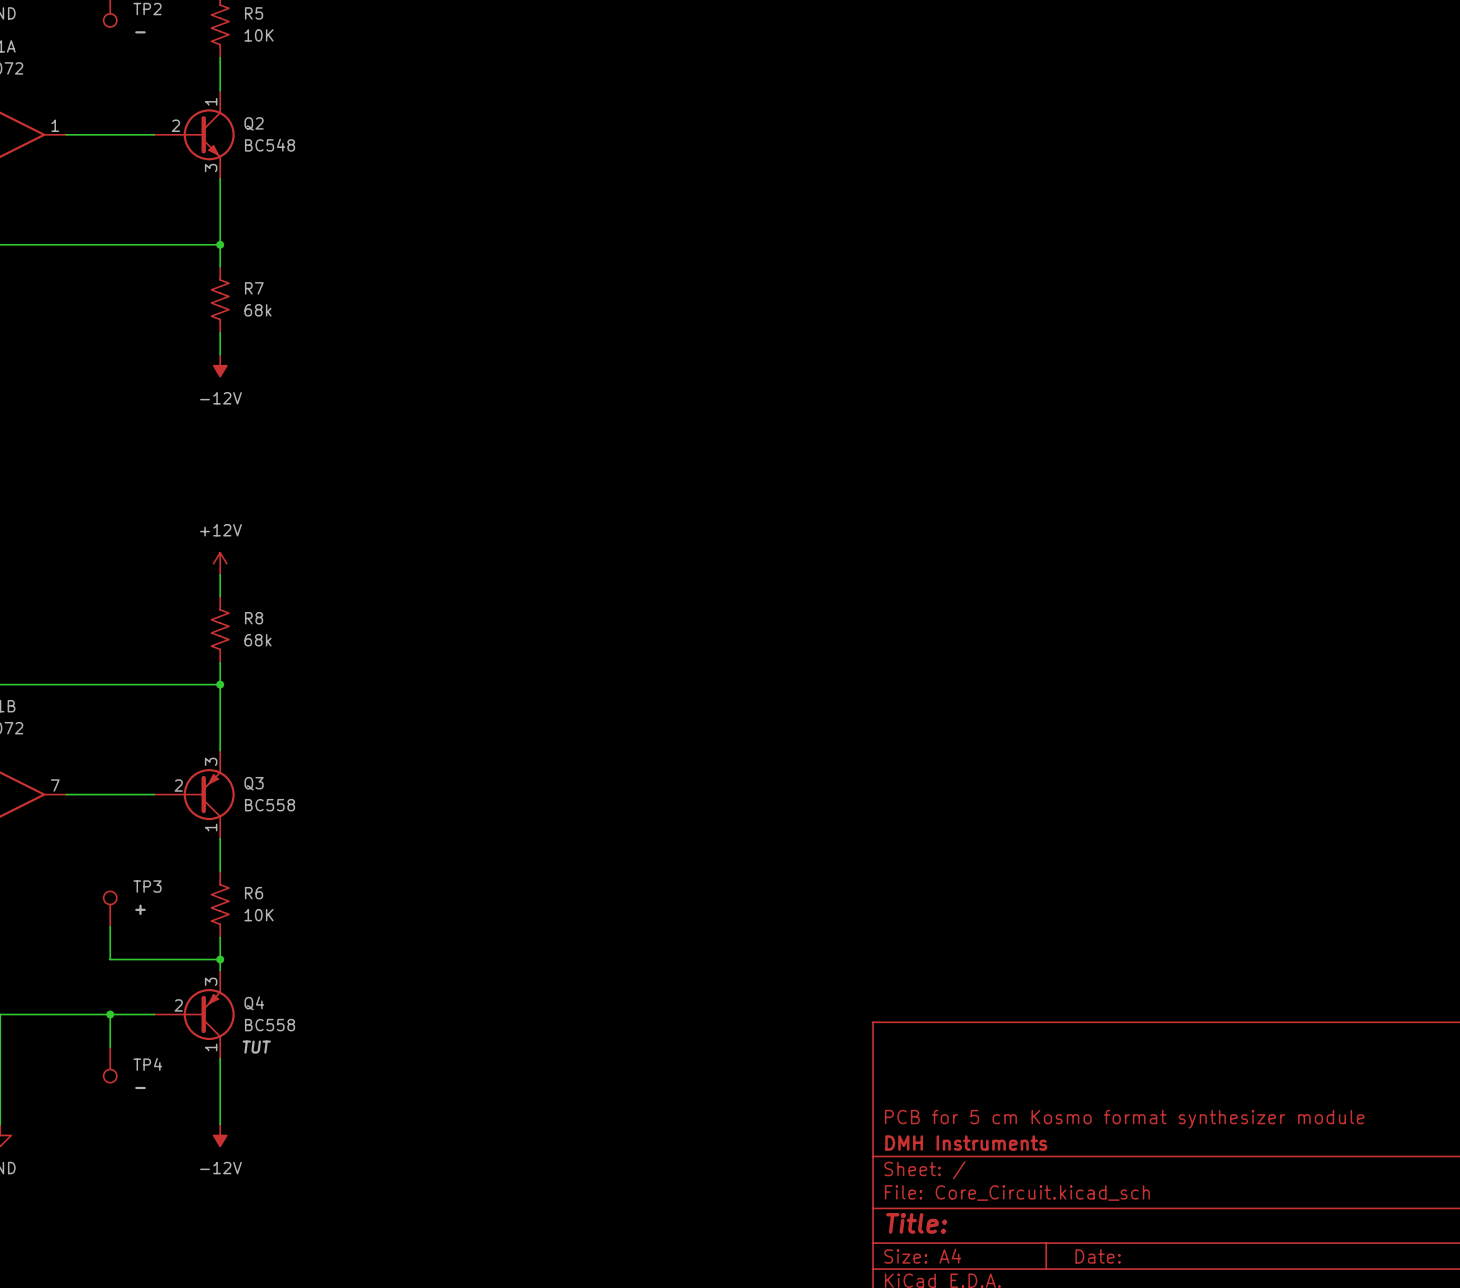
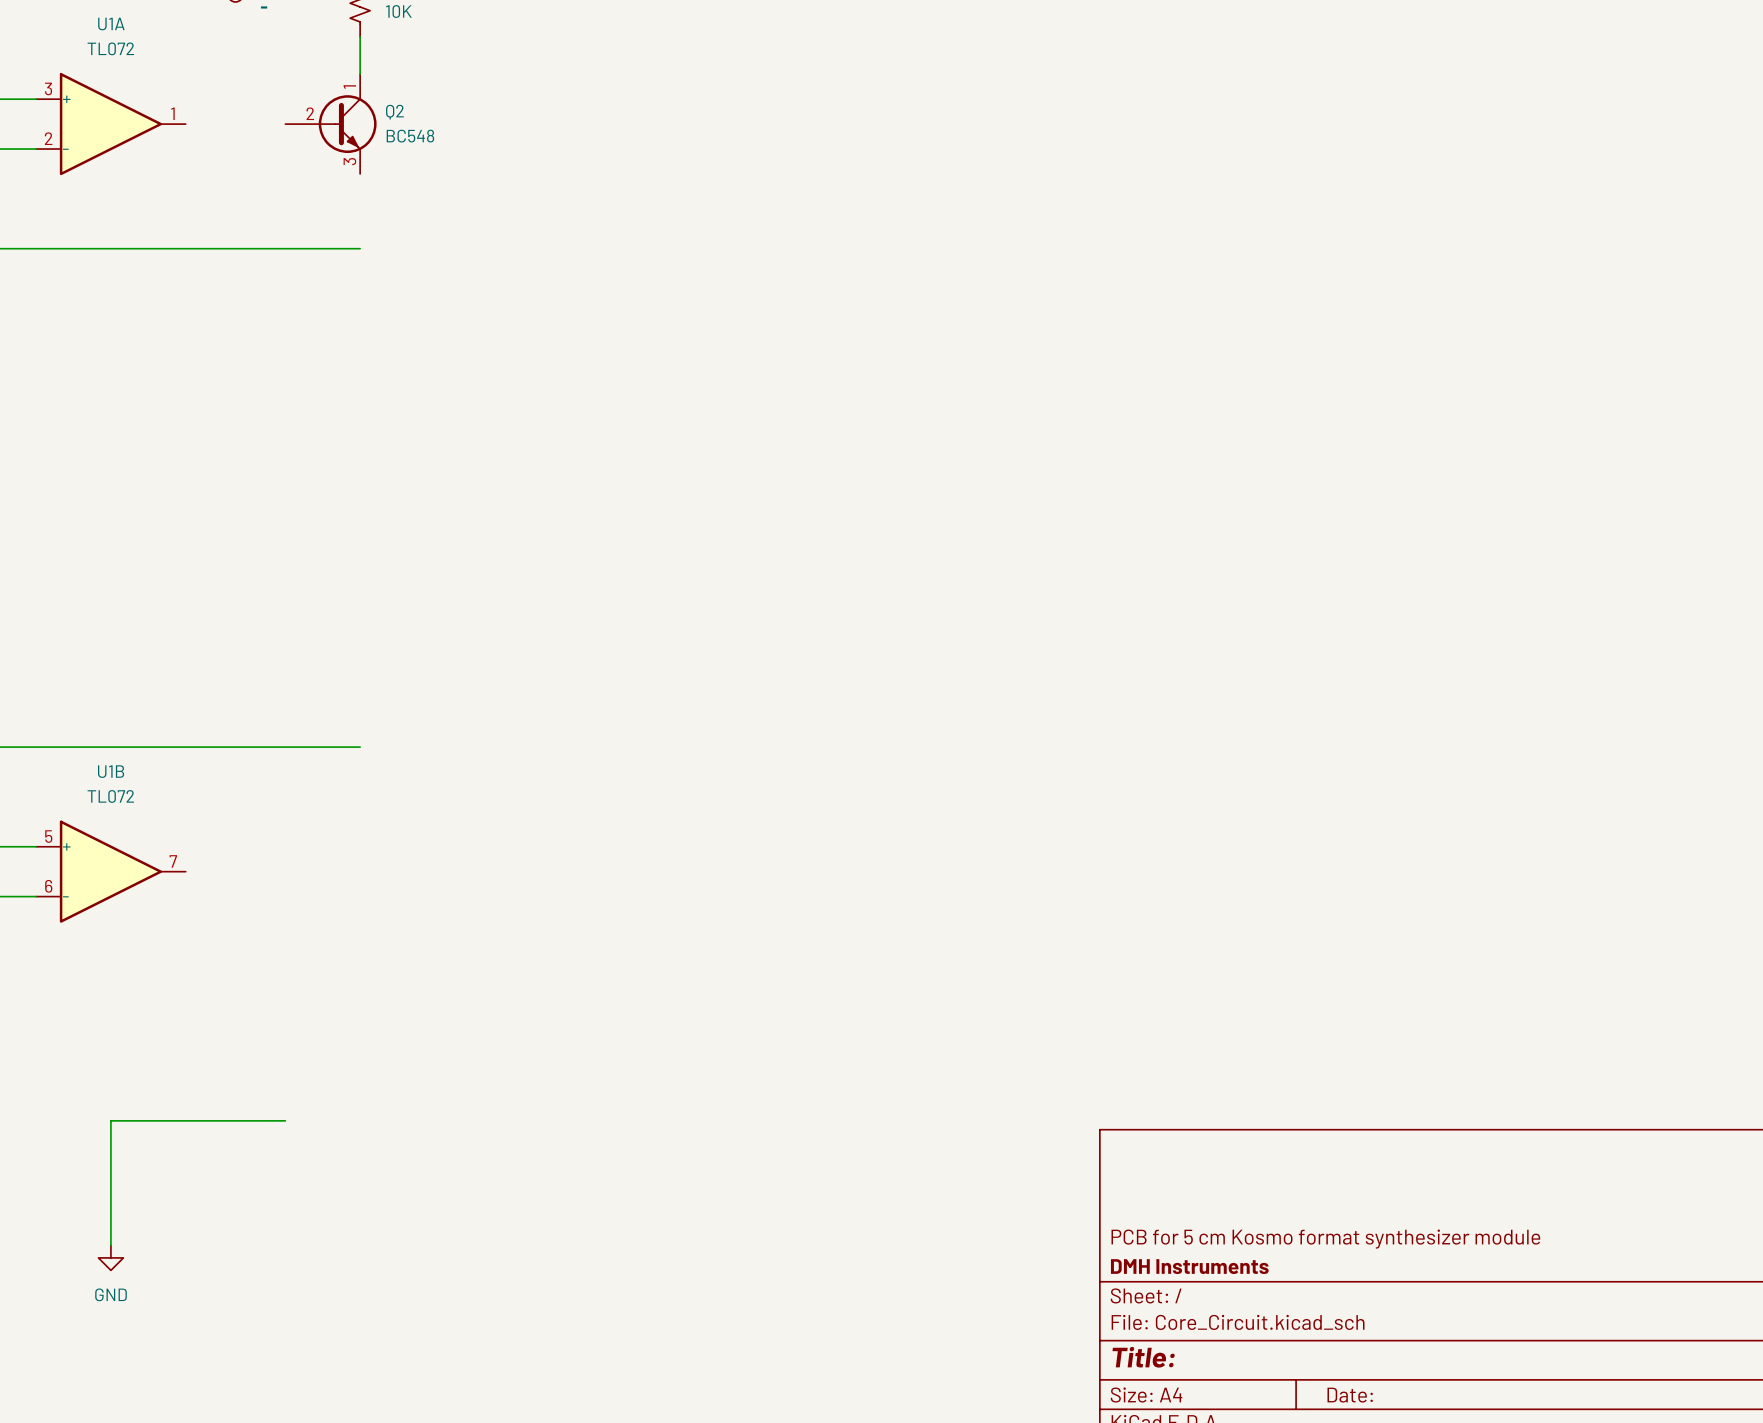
wire: (66, 134) (154, 134) -> none
wire: (220, 178) (220, 266) -> none
junction: (220, 244) -> none
R7: 68k (220, 299) -> none
wire: (220, 332) (220, 354) -> none
power symbol: -12V (220, 365) -> none
power symbol: +12V (220, 563) -> none
wire: (220, 574) (220, 596) -> none
R8: 68k (220, 629) -> none
wire: (220, 662) (220, 750) -> none
junction: (220, 684) -> none
wire: (66, 794) (154, 794) -> none
Q3: BC558 (194, 794) -> none
wire: (220, 838) (220, 871) -> none
R6: 10K (220, 904) -> none
TP3: + (110, 908) -> none
wire: (110, 926) (110, 959) (220, 959) -> none
wire: (220, 937) (220, 970) -> none
junction: (220, 959) -> none
wire: (110, 1014) (110, 1047) -> none
junction: (110, 1014) -> none
Q4: BC558 (194, 1014) -> none
wire: (220, 1058) (220, 1124) -> none
TP4: - (110, 1065) -> none
power symbol: -12V (220, 1135) -> none

